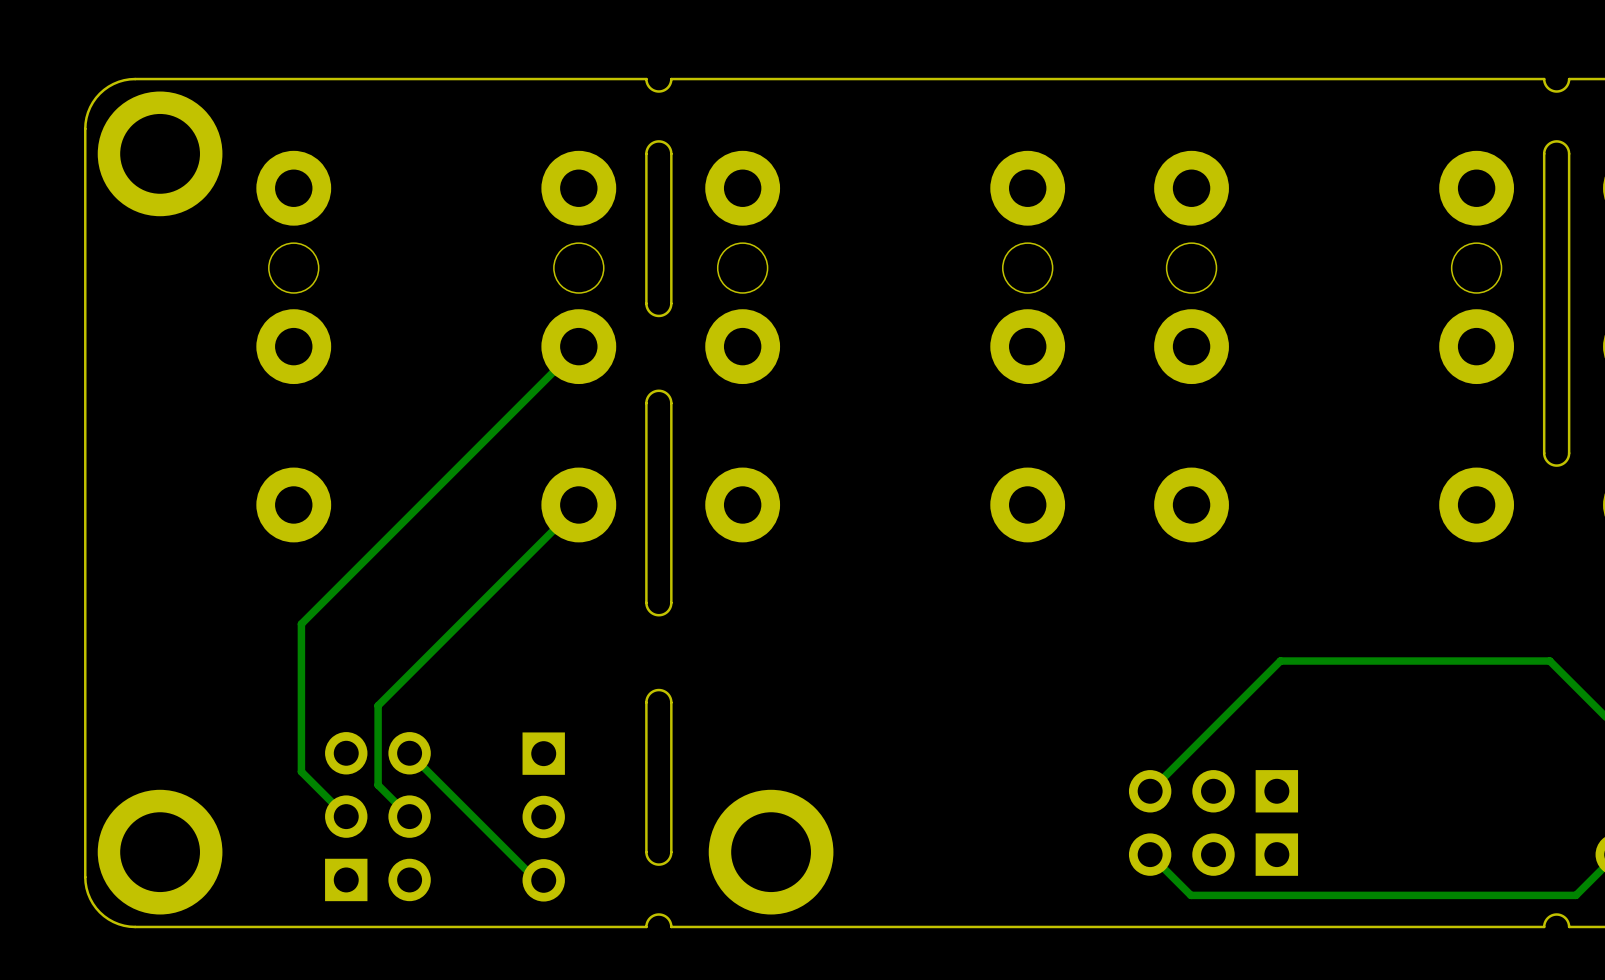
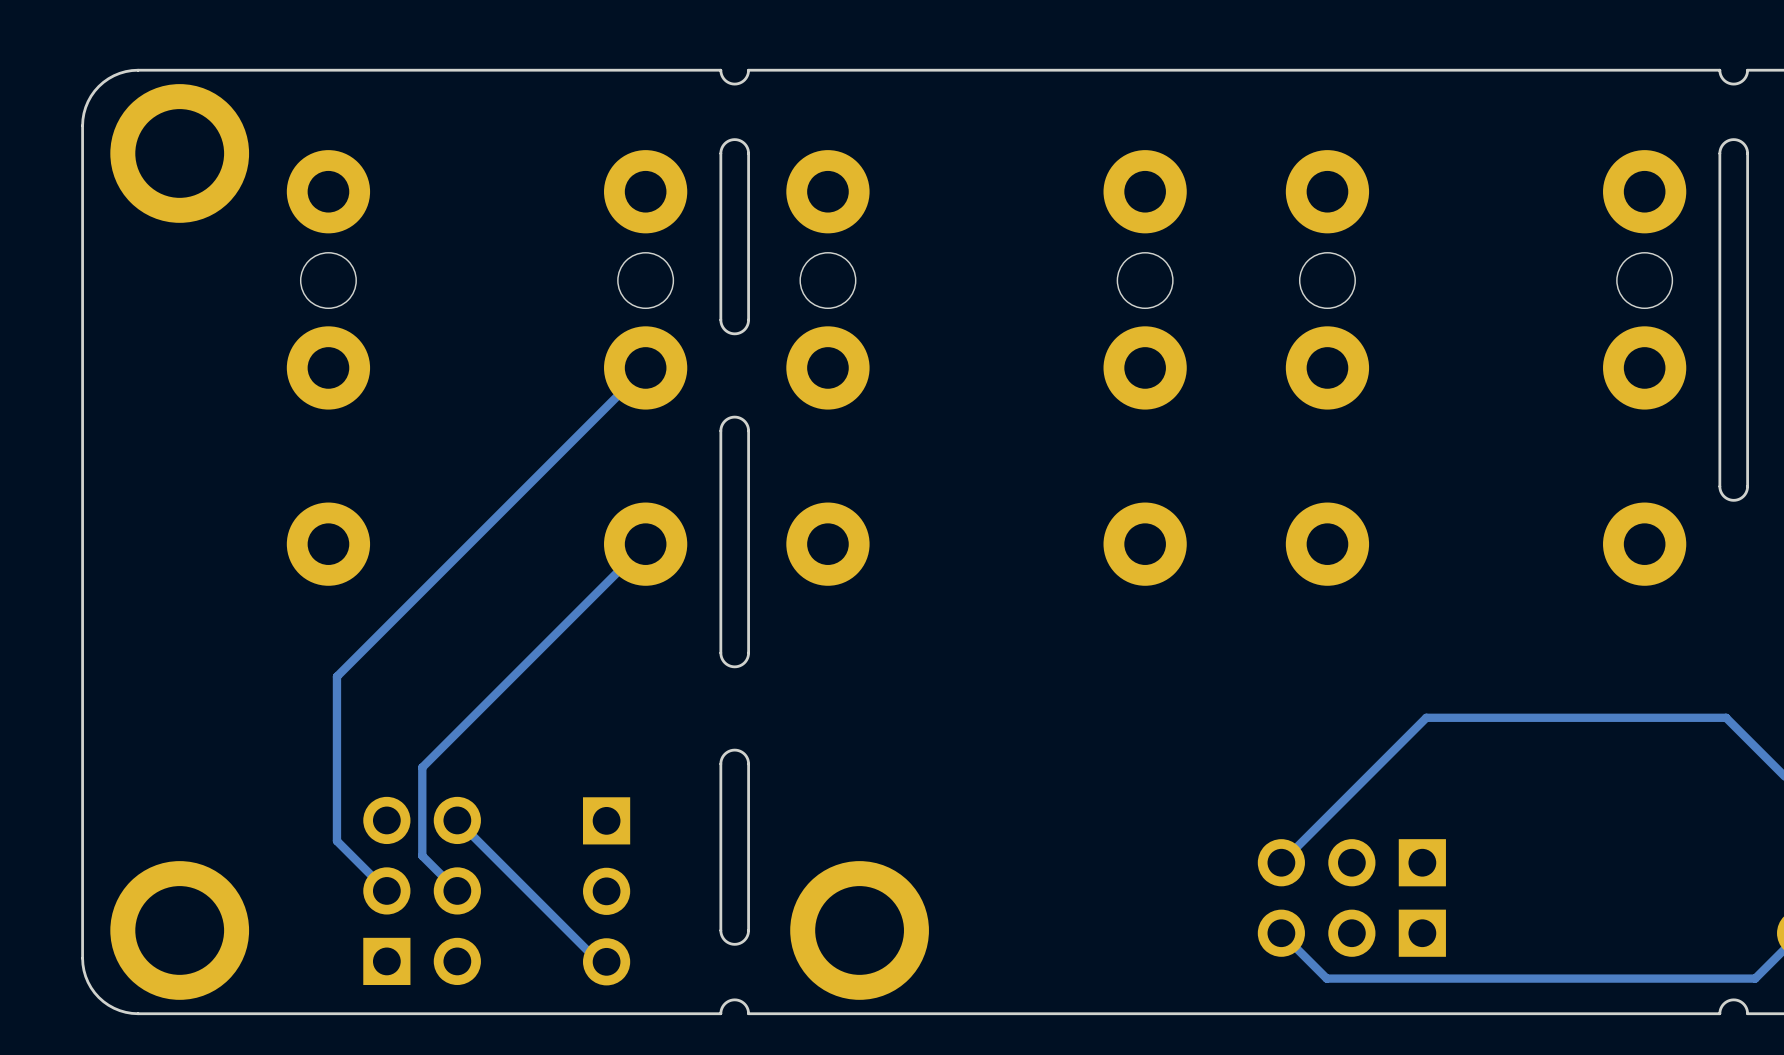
board edge: (135, 79) (118, 81) (99, 93) (88, 112) (85, 128) (85, 882) (90, 898) (104, 916) (118, 924) (135, 926) -> (151, 70) (125, 71) (103, 82) (88, 101) (82, 125) (82, 964) (88, 982) (103, 1001) (125, 1012) (151, 1013)

